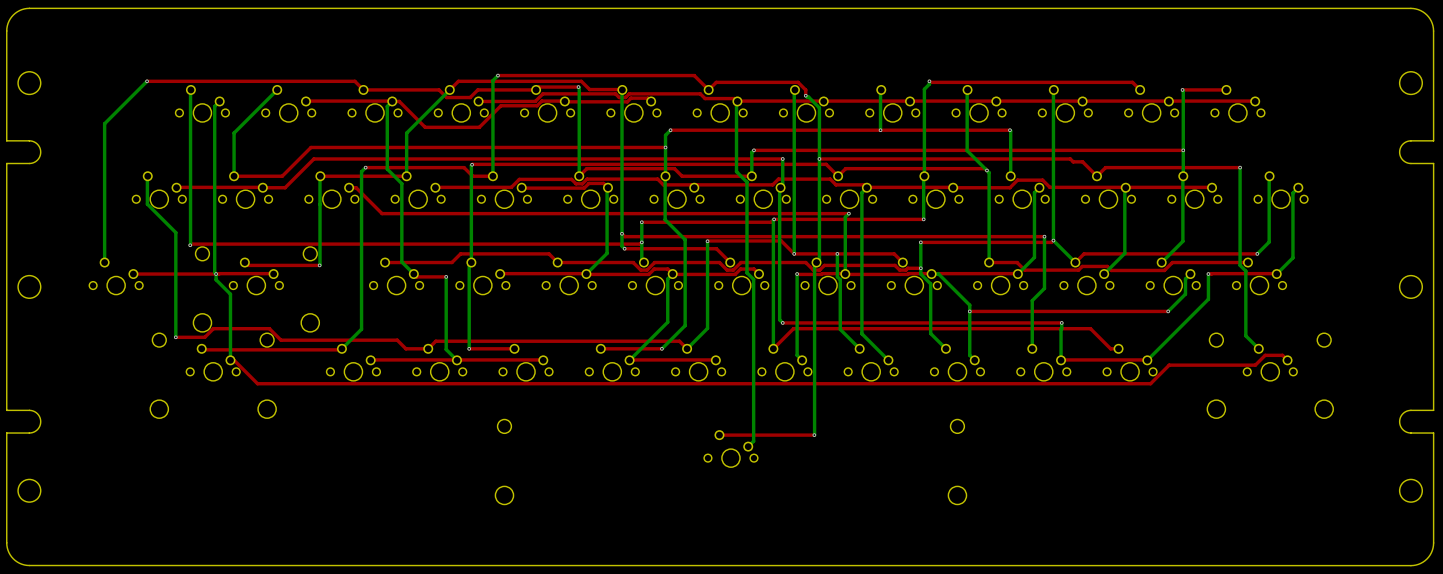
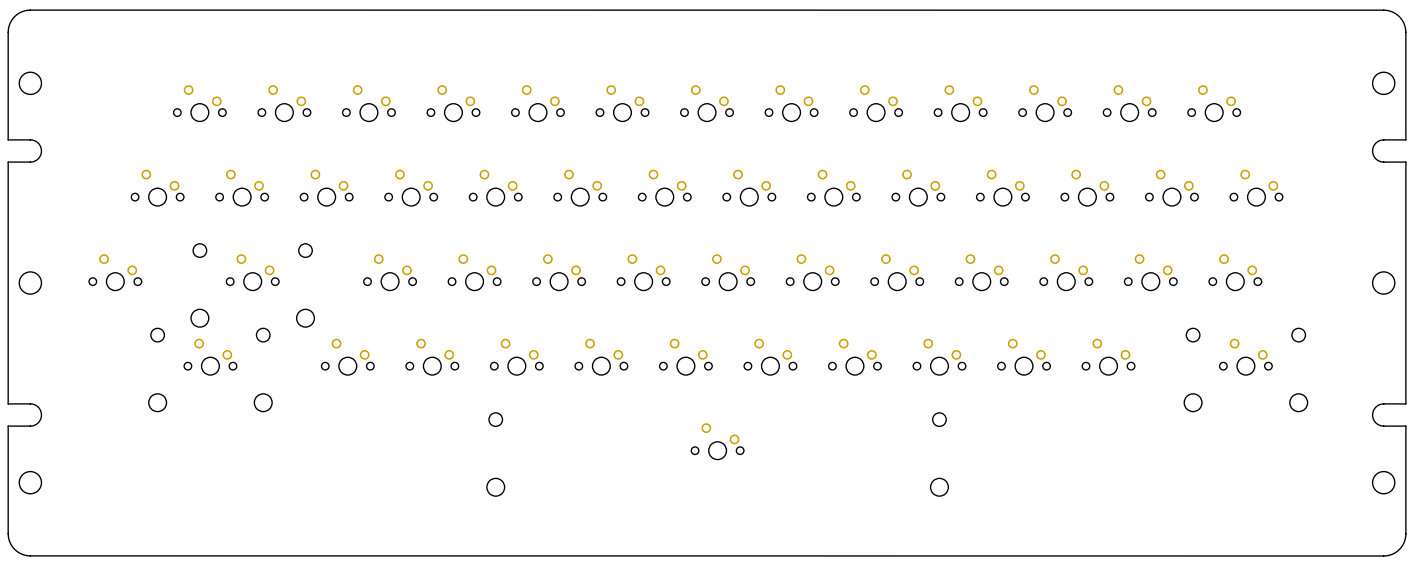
top track: (497, 75) (694, 75) (708, 89) (716, 82) (798, 82) (805, 90) (805, 95) -> none
bottom track: (497, 75) (492, 80) (492, 176) -> none
via: (497, 75) -> none
top track: (147, 81) (354, 81) (363, 89) (439, 89) (446, 97) (470, 97) (477, 89) (536, 89) (538, 87) (578, 87) -> none
bottom track: (147, 81) (104, 123) (104, 262) -> none
via: (147, 81) -> none
top track: (929, 81) (1132, 82) (1140, 89) -> none
bottom track: (929, 81) (929, 84) (924, 89) (923, 219) -> none
via: (929, 81) -> none
bottom track: (578, 87) (579, 176) -> none
via: (578, 87) -> none
bottom track: (190, 89) (190, 245) -> none
bottom track: (277, 89) (234, 133) (234, 176) -> none
bottom track: (449, 89) (406, 133) (406, 176) -> none
top track: (622, 89) (589, 89) (581, 81) (458, 81) (449, 89) -> none
bottom track: (622, 89) (621, 246) (624, 248) -> none
bottom track: (794, 89) (794, 253) -> none
bottom track: (881, 89) (880, 130) -> none
bottom track: (967, 89) (967, 150) (989, 172) (989, 262) -> none
bottom track: (1053, 89) (1053, 240) (1075, 262) -> none
bottom track: (1182, 89) (1182, 241) (1161, 262) -> none
via: (1182, 89) -> none
top track: (1226, 89) (1182, 89) -> none
bottom track: (805, 95) (819, 107) (819, 259) (814, 264) (814, 435) -> none
via: (805, 95) -> none
bottom track: (219, 101) (214, 106) (214, 272) (216, 279) (230, 294) (230, 360) -> none
bottom track: (392, 101) (387, 106) (387, 169) (401, 183) (401, 262) (413, 274) -> none
top track: (561, 101) (541, 101) (537, 105) (500, 105) (479, 127) (425, 127) (399, 101) (305, 101) -> none
top track: (651, 101) (647, 98) (631, 98) (627, 101) (564, 101) -> none
bottom track: (737, 101) (736, 171) (746, 182) (746, 272) (753, 279) (753, 441) (748, 446) -> none
top track: (1255, 101) (737, 101) (734, 98) (705, 98) (700, 93) (629, 93) (625, 97) (619, 97) (615, 93) (542, 93) (535, 101) (478, 101) -> none
bottom track: (670, 130) (665, 135) (665, 219) (685, 239) (685, 325) (661, 348) -> none
via: (670, 130) -> none
via: (880, 130) -> none
top track: (1009, 130) (670, 130) -> none
bottom track: (1009, 130) (1010, 176) -> none
via: (1009, 130) -> none
top track: (665, 147) (311, 147) (282, 176) (234, 176) -> none
via: (665, 147) -> none
bottom track: (753, 150) (751, 152) (751, 176) -> none
via: (753, 150) -> none
top track: (1183, 150) (753, 150) -> none
via: (1183, 150) -> none
top track: (782, 158) (313, 158) (285, 187) (176, 187) -> none
bottom track: (782, 158) (782, 185) (779, 188) (779, 319) (782, 322) -> none
via: (782, 158) -> none
top track: (819, 158) (1070, 158) (1073, 161) (1082, 161) (1096, 176) (1105, 167) (1240, 167) -> none
via: (819, 158) -> none
top track: (472, 164) (826, 164) (838, 176) (845, 168) (985, 168) (986, 170) -> none
bottom track: (472, 164) (469, 348) -> none
via: (472, 164) -> none
top track: (365, 167) (464, 167) (472, 176) (492, 176) -> none
bottom track: (365, 167) (361, 171) (361, 329) (341, 348) -> none
via: (365, 167) -> none
bottom track: (1240, 167) (1240, 265) (1245, 271) (1245, 335) (1258, 348) -> none
via: (1240, 167) -> none
via: (986, 170) -> none
bottom track: (147, 176) (147, 204) (175, 232) (175, 337) -> none
bottom track: (320, 176) (319, 204) -> none
top track: (406, 176) (320, 176) -> none
top track: (751, 176) (682, 176) (674, 168) (586, 168) (579, 176) -> none
bottom track: (1269, 176) (1269, 242) (1257, 253) -> none
top track: (349, 187) (356, 187) (382, 213) (848, 213) -> none
top track: (608, 187) (603, 183) (588, 183) (584, 188) (521, 187) -> none
bottom track: (608, 187) (607, 253) (586, 274) -> none
bottom track: (866, 187) (861, 192) (861, 333) (888, 360) -> none
bottom track: (1039, 187) (1034, 192) (1034, 257) (1017, 274) -> none
bottom track: (1125, 187) (1124, 253) (1104, 274) -> none
top track: (1212, 187) (1049, 187) (1042, 180) (1017, 180) (1009, 187) (866, 187) (863, 184) (836, 184) (830, 179) (778, 179) (772, 184) (697, 184) (694, 187) (691, 184) (663, 184) (657, 179) (587, 179) (582, 183) (576, 183) (571, 179) (519, 179) (511, 187) (435, 187) -> none
bottom track: (1298, 187) (1292, 193) (1292, 257) (1276, 274) -> none
bottom track: (320, 204) (319, 265) -> none
bottom track: (848, 213) (845, 217) (845, 274) -> none
via: (848, 213) -> none
bottom track: (774, 219) (773, 348) -> none
via: (774, 219) -> none
top track: (923, 219) (774, 219) (771, 222) (641, 222) -> none
via: (923, 219) -> none
bottom track: (641, 222) (641, 260) (643, 262) -> none
via: (641, 222) -> none
top track: (621, 233) (624, 236) (1044, 236) -> none
via: (621, 233) -> none
bottom track: (1044, 236) (1044, 288) (1032, 300) (1032, 348) -> none
via: (1044, 236) -> none
top track: (1053, 240) (1051, 242) (920, 242) -> none
via: (1053, 240) -> none
top track: (707, 241) (781, 240) (794, 253) (894, 253) (902, 262) -> none
bottom track: (707, 241) (707, 328) (687, 348) -> none
via: (707, 241) -> none
top track: (641, 242) (640, 244) (190, 245) -> none
via: (641, 242) -> none
bottom track: (920, 242) (920, 274) (930, 283) (930, 333) (945, 348) -> none
via: (920, 242) -> none
via: (190, 245) -> none
top track: (624, 248) (716, 248) (730, 262) -> none
via: (624, 248) -> none
via: (794, 253) -> none
bottom track: (837, 253) (837, 276) (840, 279) (840, 329) (859, 348) -> none
via: (837, 253) -> none
top track: (1257, 253) (1084, 253) (1075, 262) -> none
via: (1257, 253) -> none
top track: (244, 262) (247, 265) (319, 265) -> none
top track: (385, 262) (451, 262) (460, 253) (549, 253) (557, 262) (633, 262) (640, 270) (647, 270) (654, 262) (719, 262) (727, 270) (733, 270) (740, 262) (805, 262) (813, 270) (819, 270) (824, 265) (894, 265) (899, 270) (920, 268) -> none
top track: (1247, 262) (1172, 262) (1164, 270) (1111, 270) (1107, 266) (1082, 266) (1078, 270) (1024, 270) (1017, 262) (989, 262) -> none
via: (319, 265) -> none
via: (920, 268) -> none
via: (216, 274) -> none
top track: (273, 274) (133, 274) -> none
top track: (413, 274) (416, 276) (446, 276) -> none
bottom track: (672, 274) (667, 279) (667, 322) (629, 360) -> none
top track: (759, 274) (754, 269) (740, 269) (735, 274) (673, 274) (667, 269) (654, 269) (648, 274) (500, 274) -> none
bottom track: (797, 274) (797, 355) (802, 360) -> none
via: (797, 274) -> none
bottom track: (931, 274) (938, 274) (969, 305) (969, 355) (974, 360) -> none
top track: (1017, 274) (797, 274) -> none
bottom track: (1190, 274) (1185, 279) (1185, 294) (1168, 311) -> none
bottom track: (1208, 274) (1208, 299) (1147, 360) -> none
via: (1208, 274) -> none
top track: (1276, 274) (1208, 274) -> none
bottom track: (446, 276) (446, 349) (456, 360) -> none
via: (446, 276) -> none
via: (969, 311) -> none
top track: (1168, 311) (969, 311) -> none
via: (1168, 311) -> none
via: (782, 322) -> none
top track: (1061, 322) (782, 322) -> none
bottom track: (1061, 322) (1061, 360) -> none
via: (1061, 322) -> none
top track: (175, 337) (204, 337) (213, 328) (269, 328) (280, 340) (397, 340) (405, 348) (428, 348) (435, 341) (679, 341) (687, 348) -> none
via: (175, 337) -> none
top track: (341, 348) (201, 348) -> none
via: (469, 348) -> none
top track: (514, 348) (469, 348) -> none
top track: (661, 348) (600, 348) -> none
via: (661, 348) -> none
top track: (1118, 348) (1110, 348) (1090, 328) (793, 328) (773, 348) -> none
top track: (543, 360) (370, 360) -> none
top track: (715, 360) (629, 360) -> none
top track: (1147, 360) (1061, 360) -> none
top track: (1287, 360) (1282, 355) (1265, 355) (1255, 365) (1169, 365) (1150, 383) (257, 383) (234, 360) (230, 360) -> none
top track: (814, 435) (719, 435) -> none
via: (814, 435) -> none

